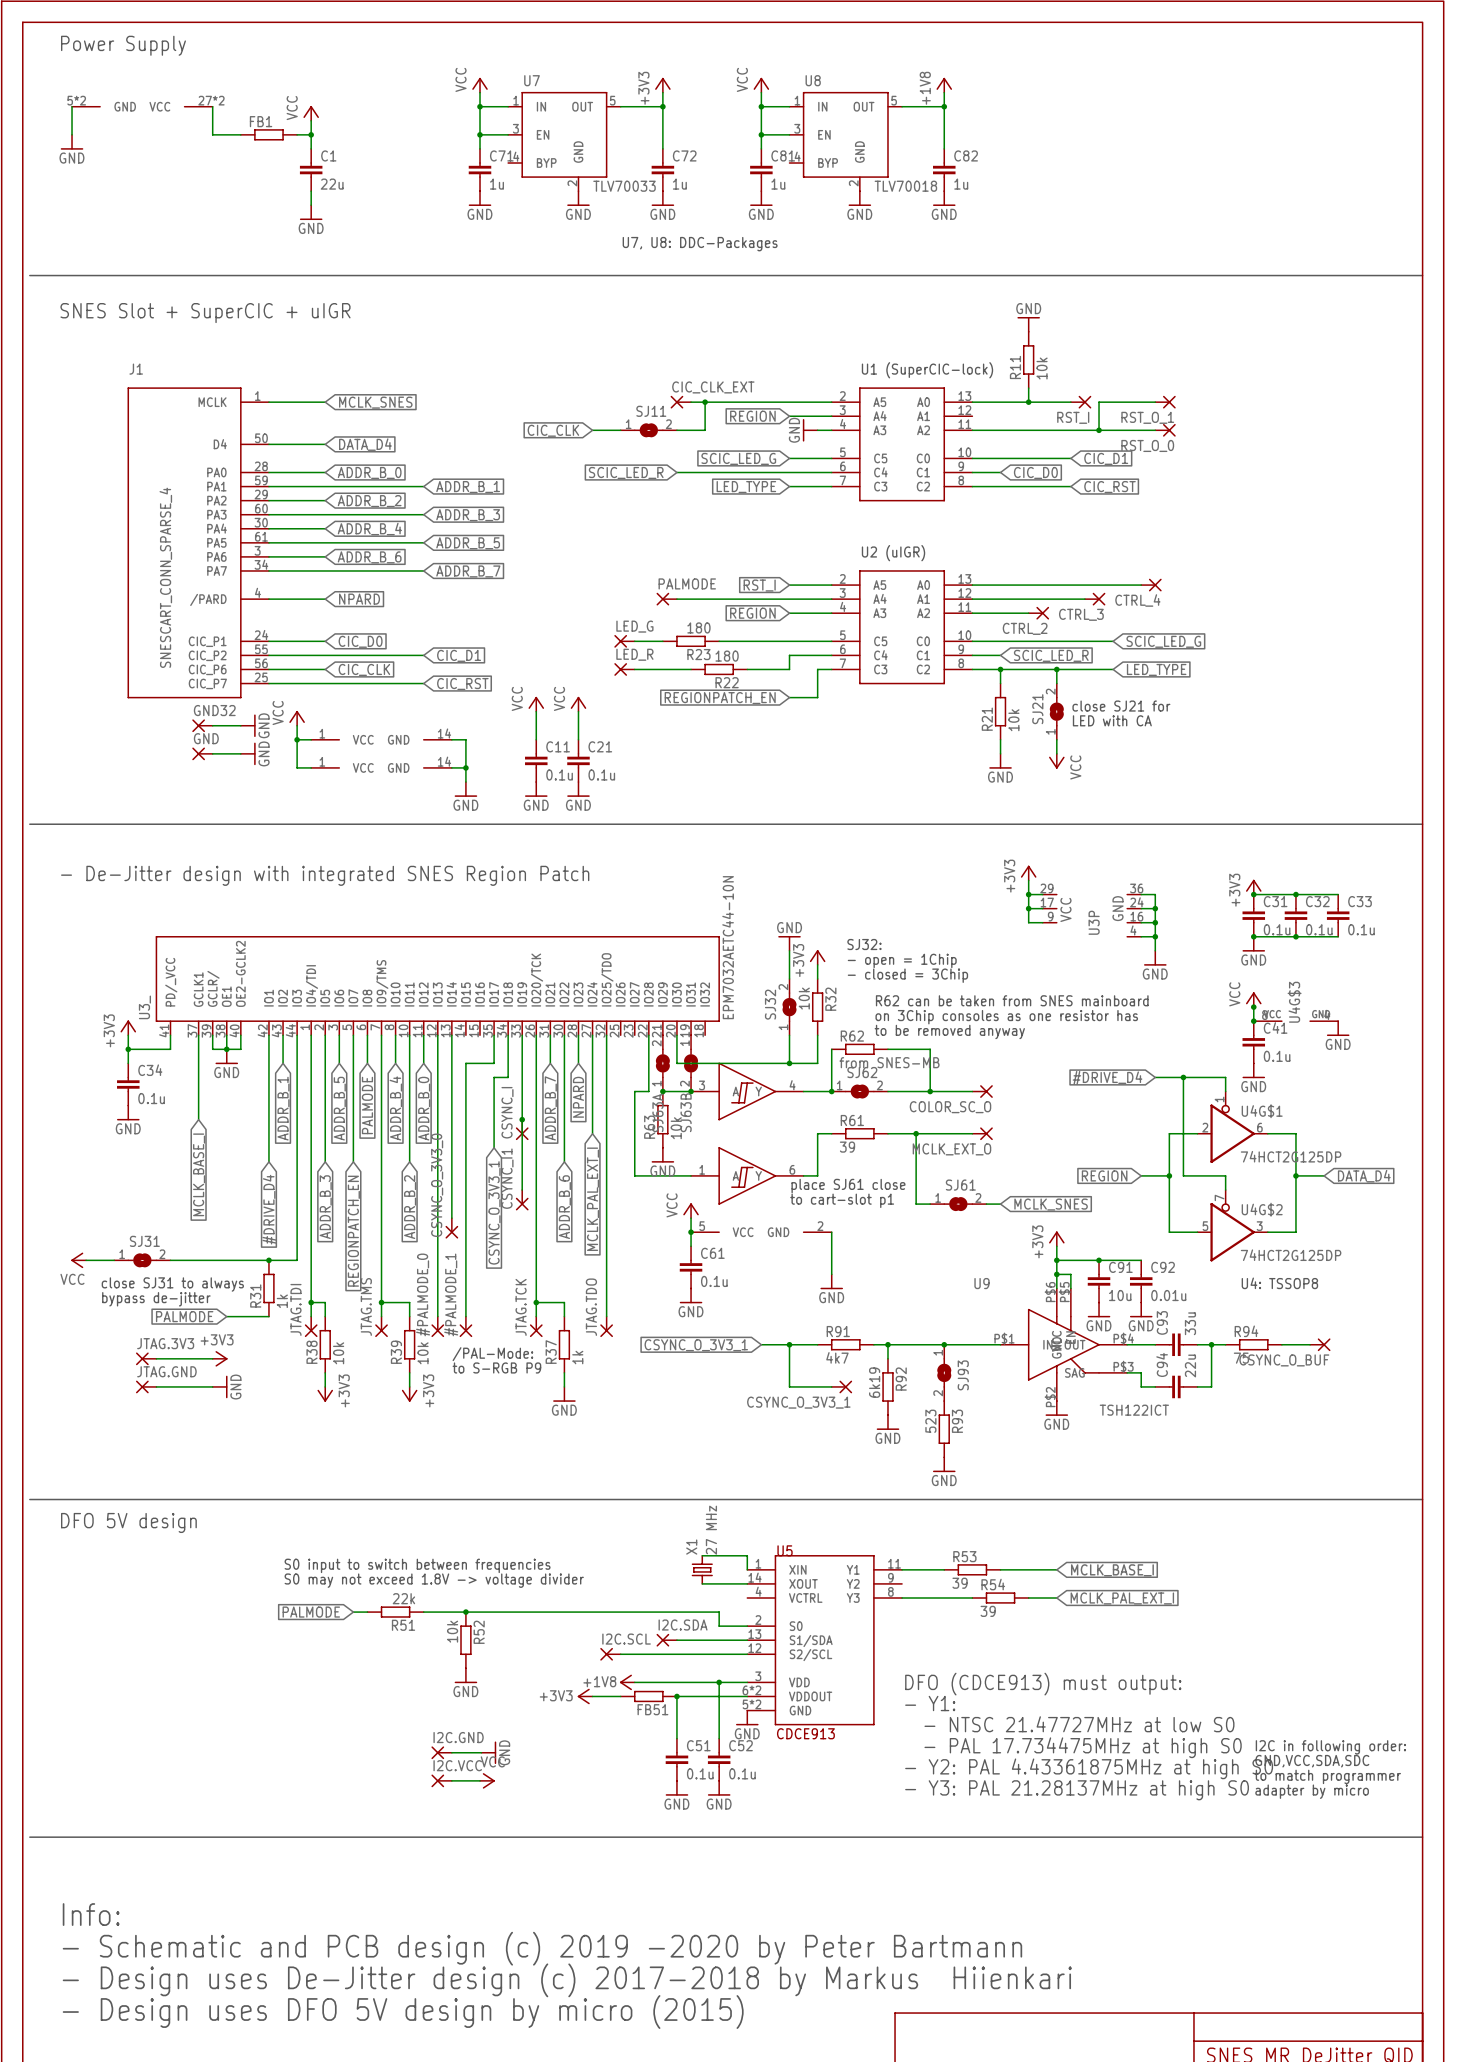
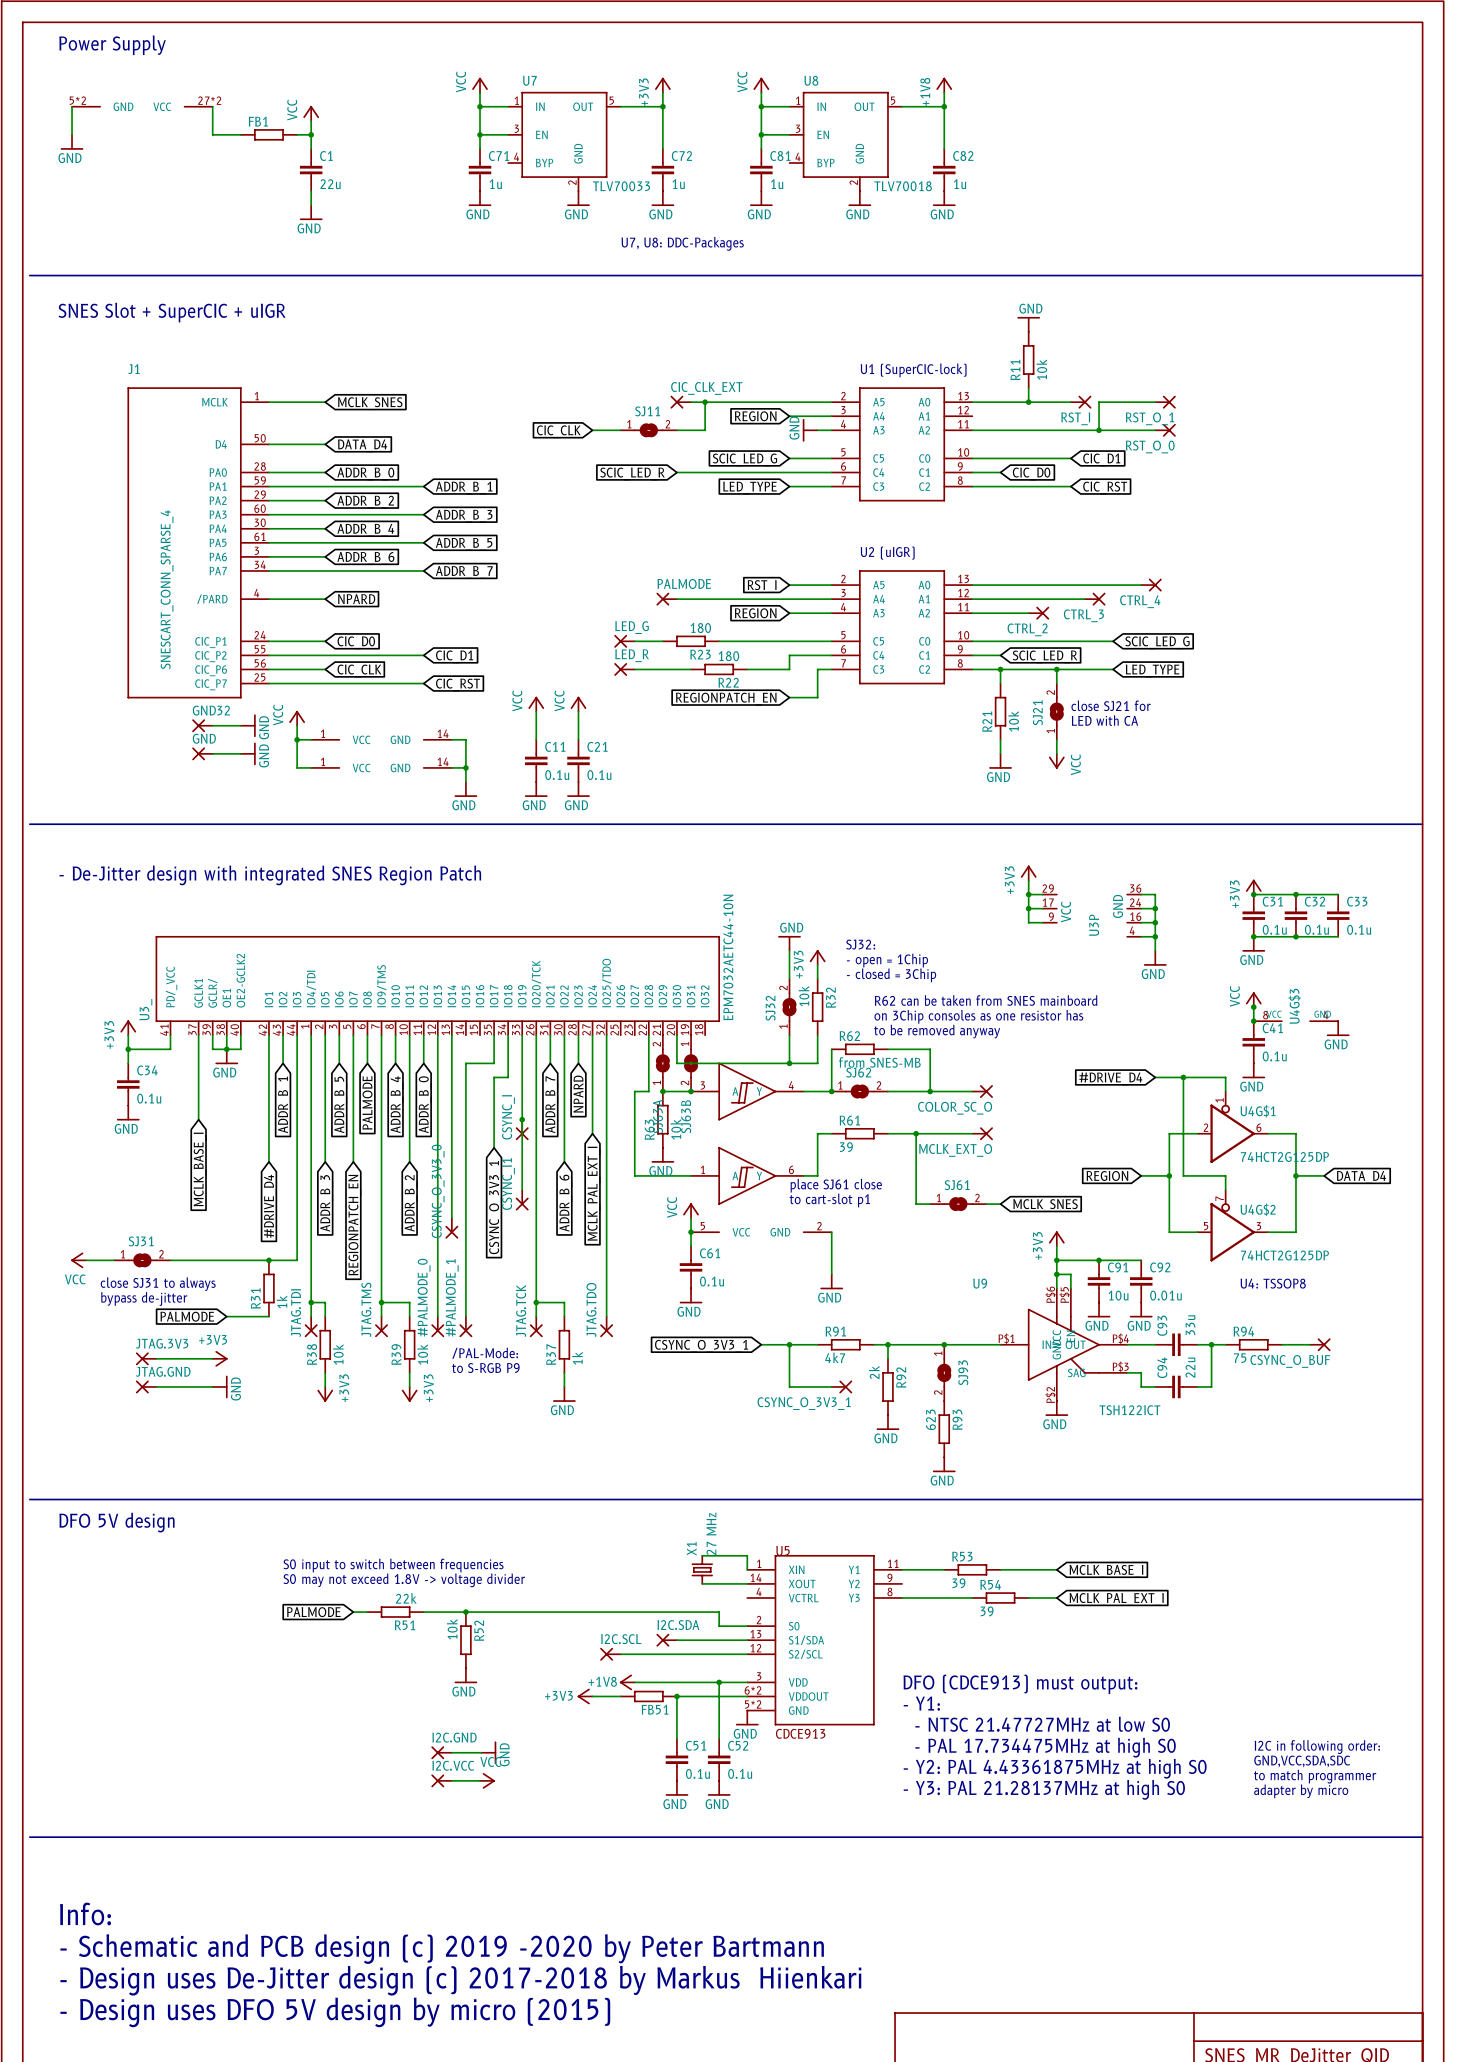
R92 value: 6k19 (874, 1382) -> 2k (874, 1372)
R93 value: 523 (930, 1421) -> 623 (930, 1419)

